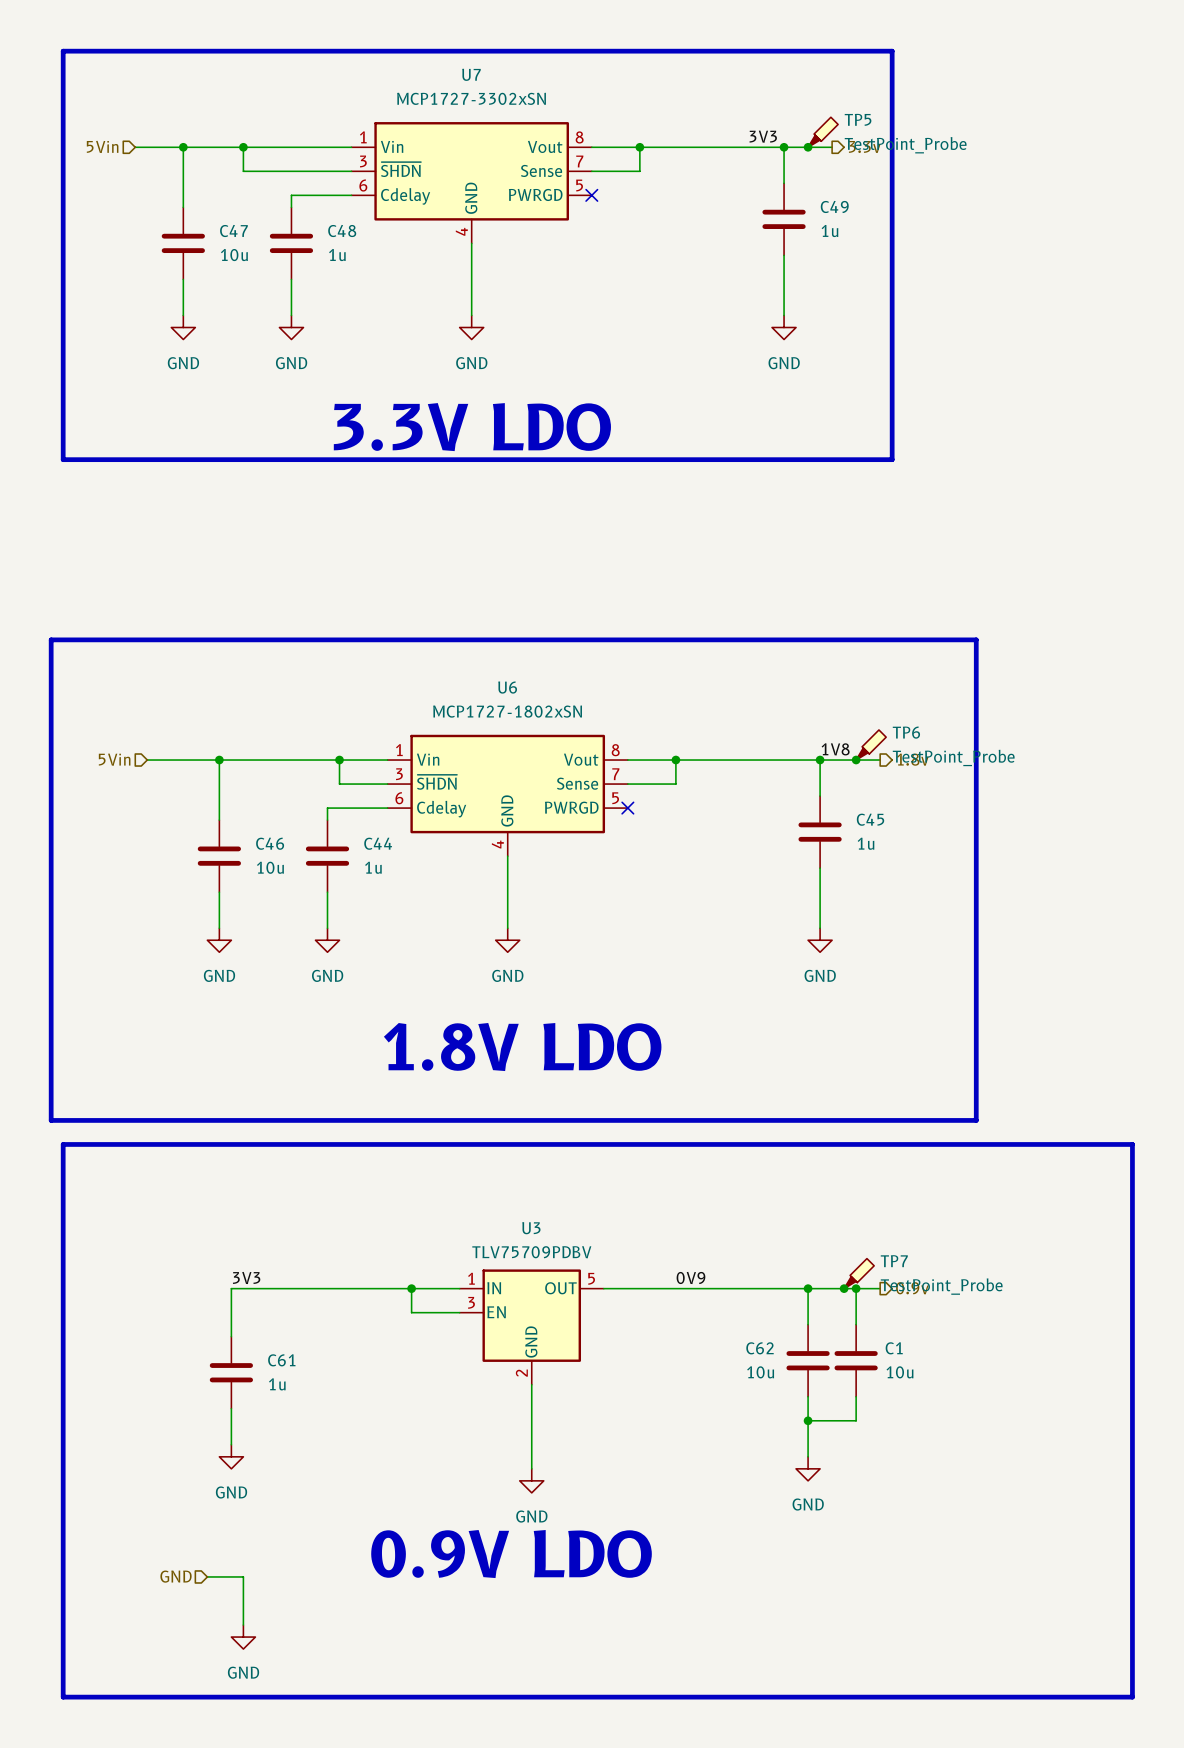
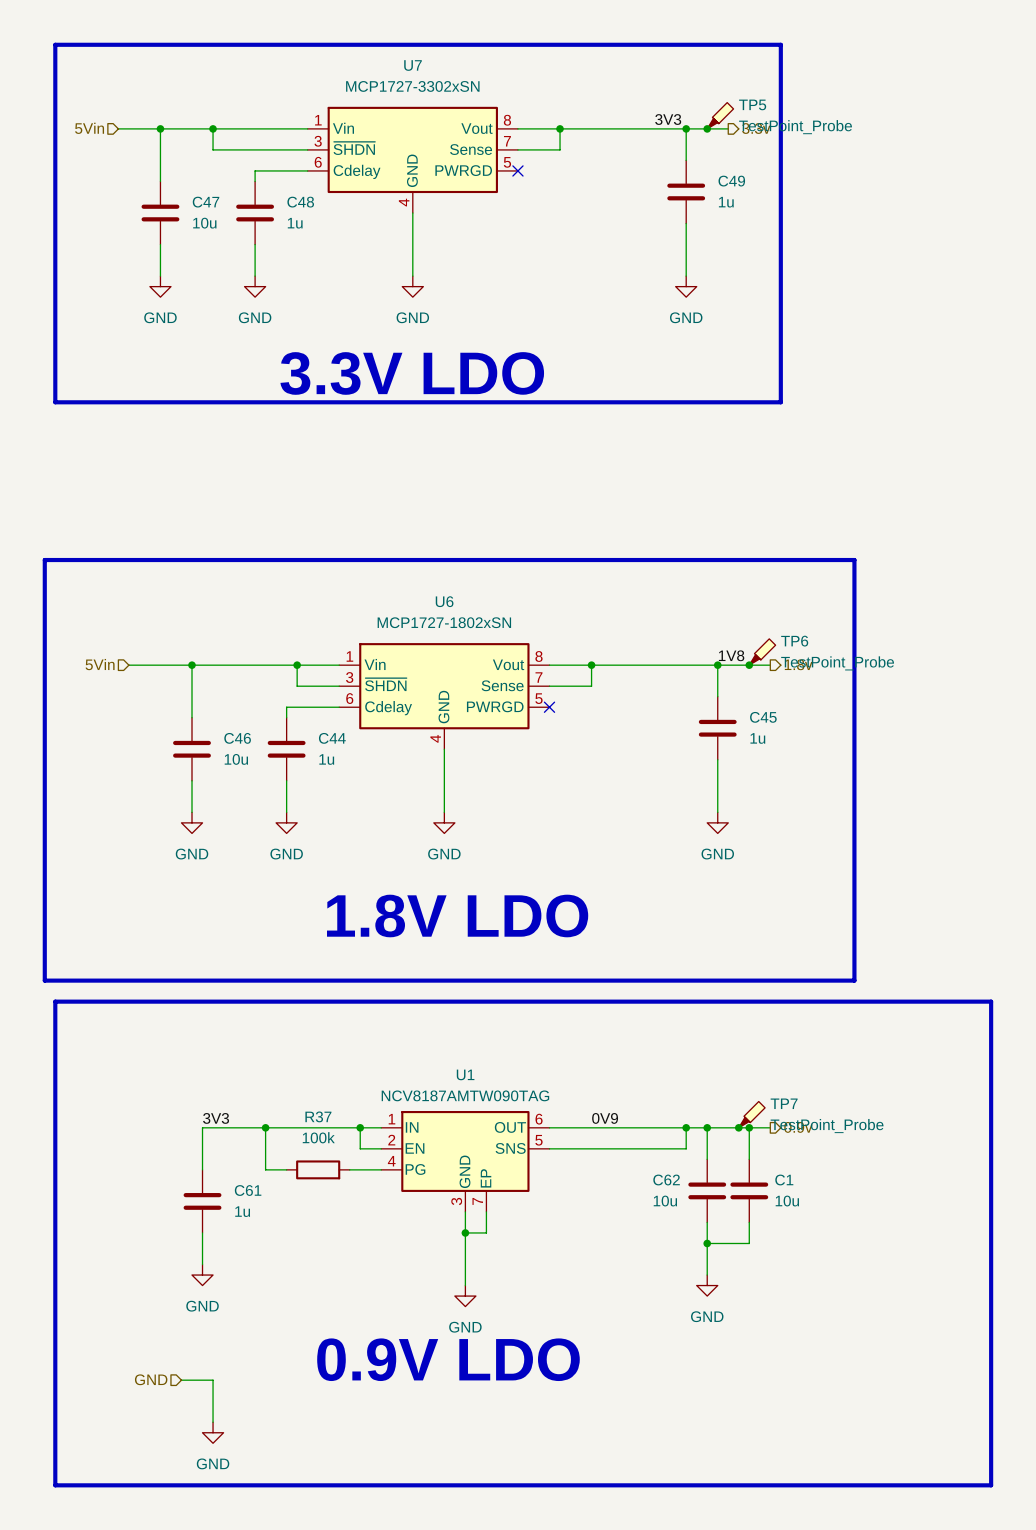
wire: none -> (265, 1127) (265, 1169) (286, 1169)
junction: none -> (265, 1127)
wire: none -> (686, 1127) (686, 1148) (549, 1148)
junction: none -> (686, 1127)
U3: TLV75709PDBV (531, 1327) -> none
U1: none -> NCV8187AMTW090TAG (465, 1161)
R37: none -> 100k (318, 1169)
wire: none -> (349, 1169) (381, 1169)
wire: none -> (486, 1211) (486, 1232) (465, 1232)
junction: none -> (465, 1232)

